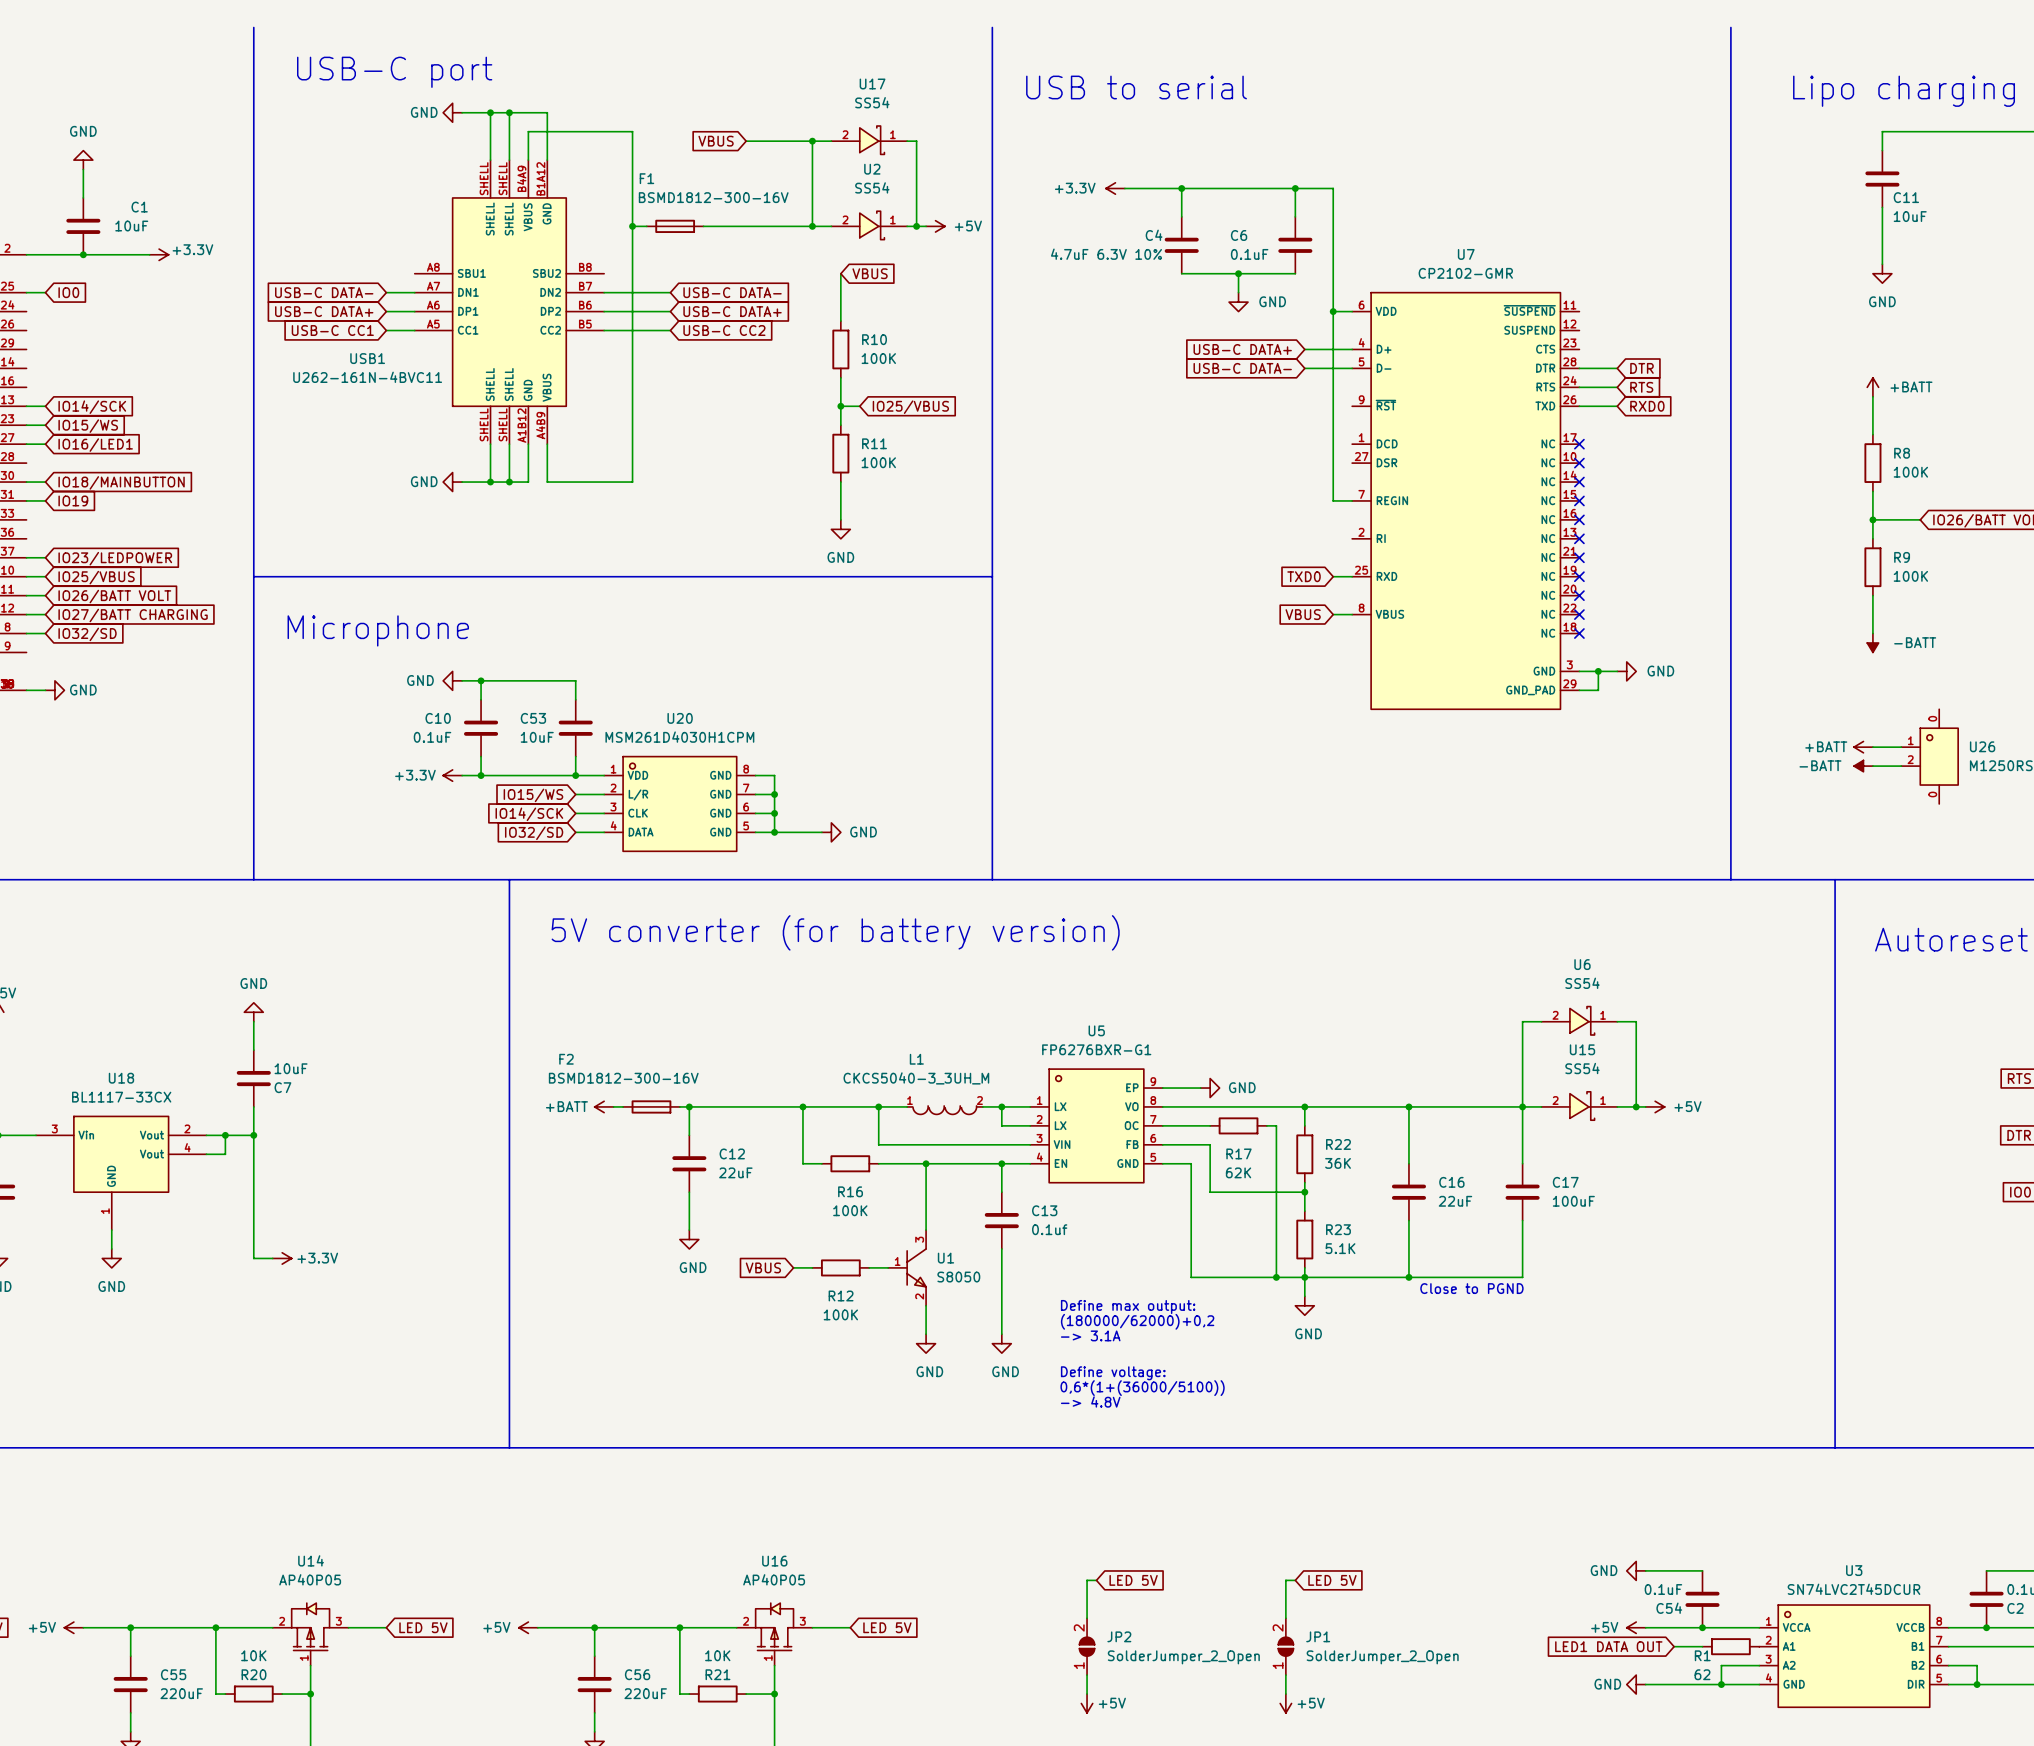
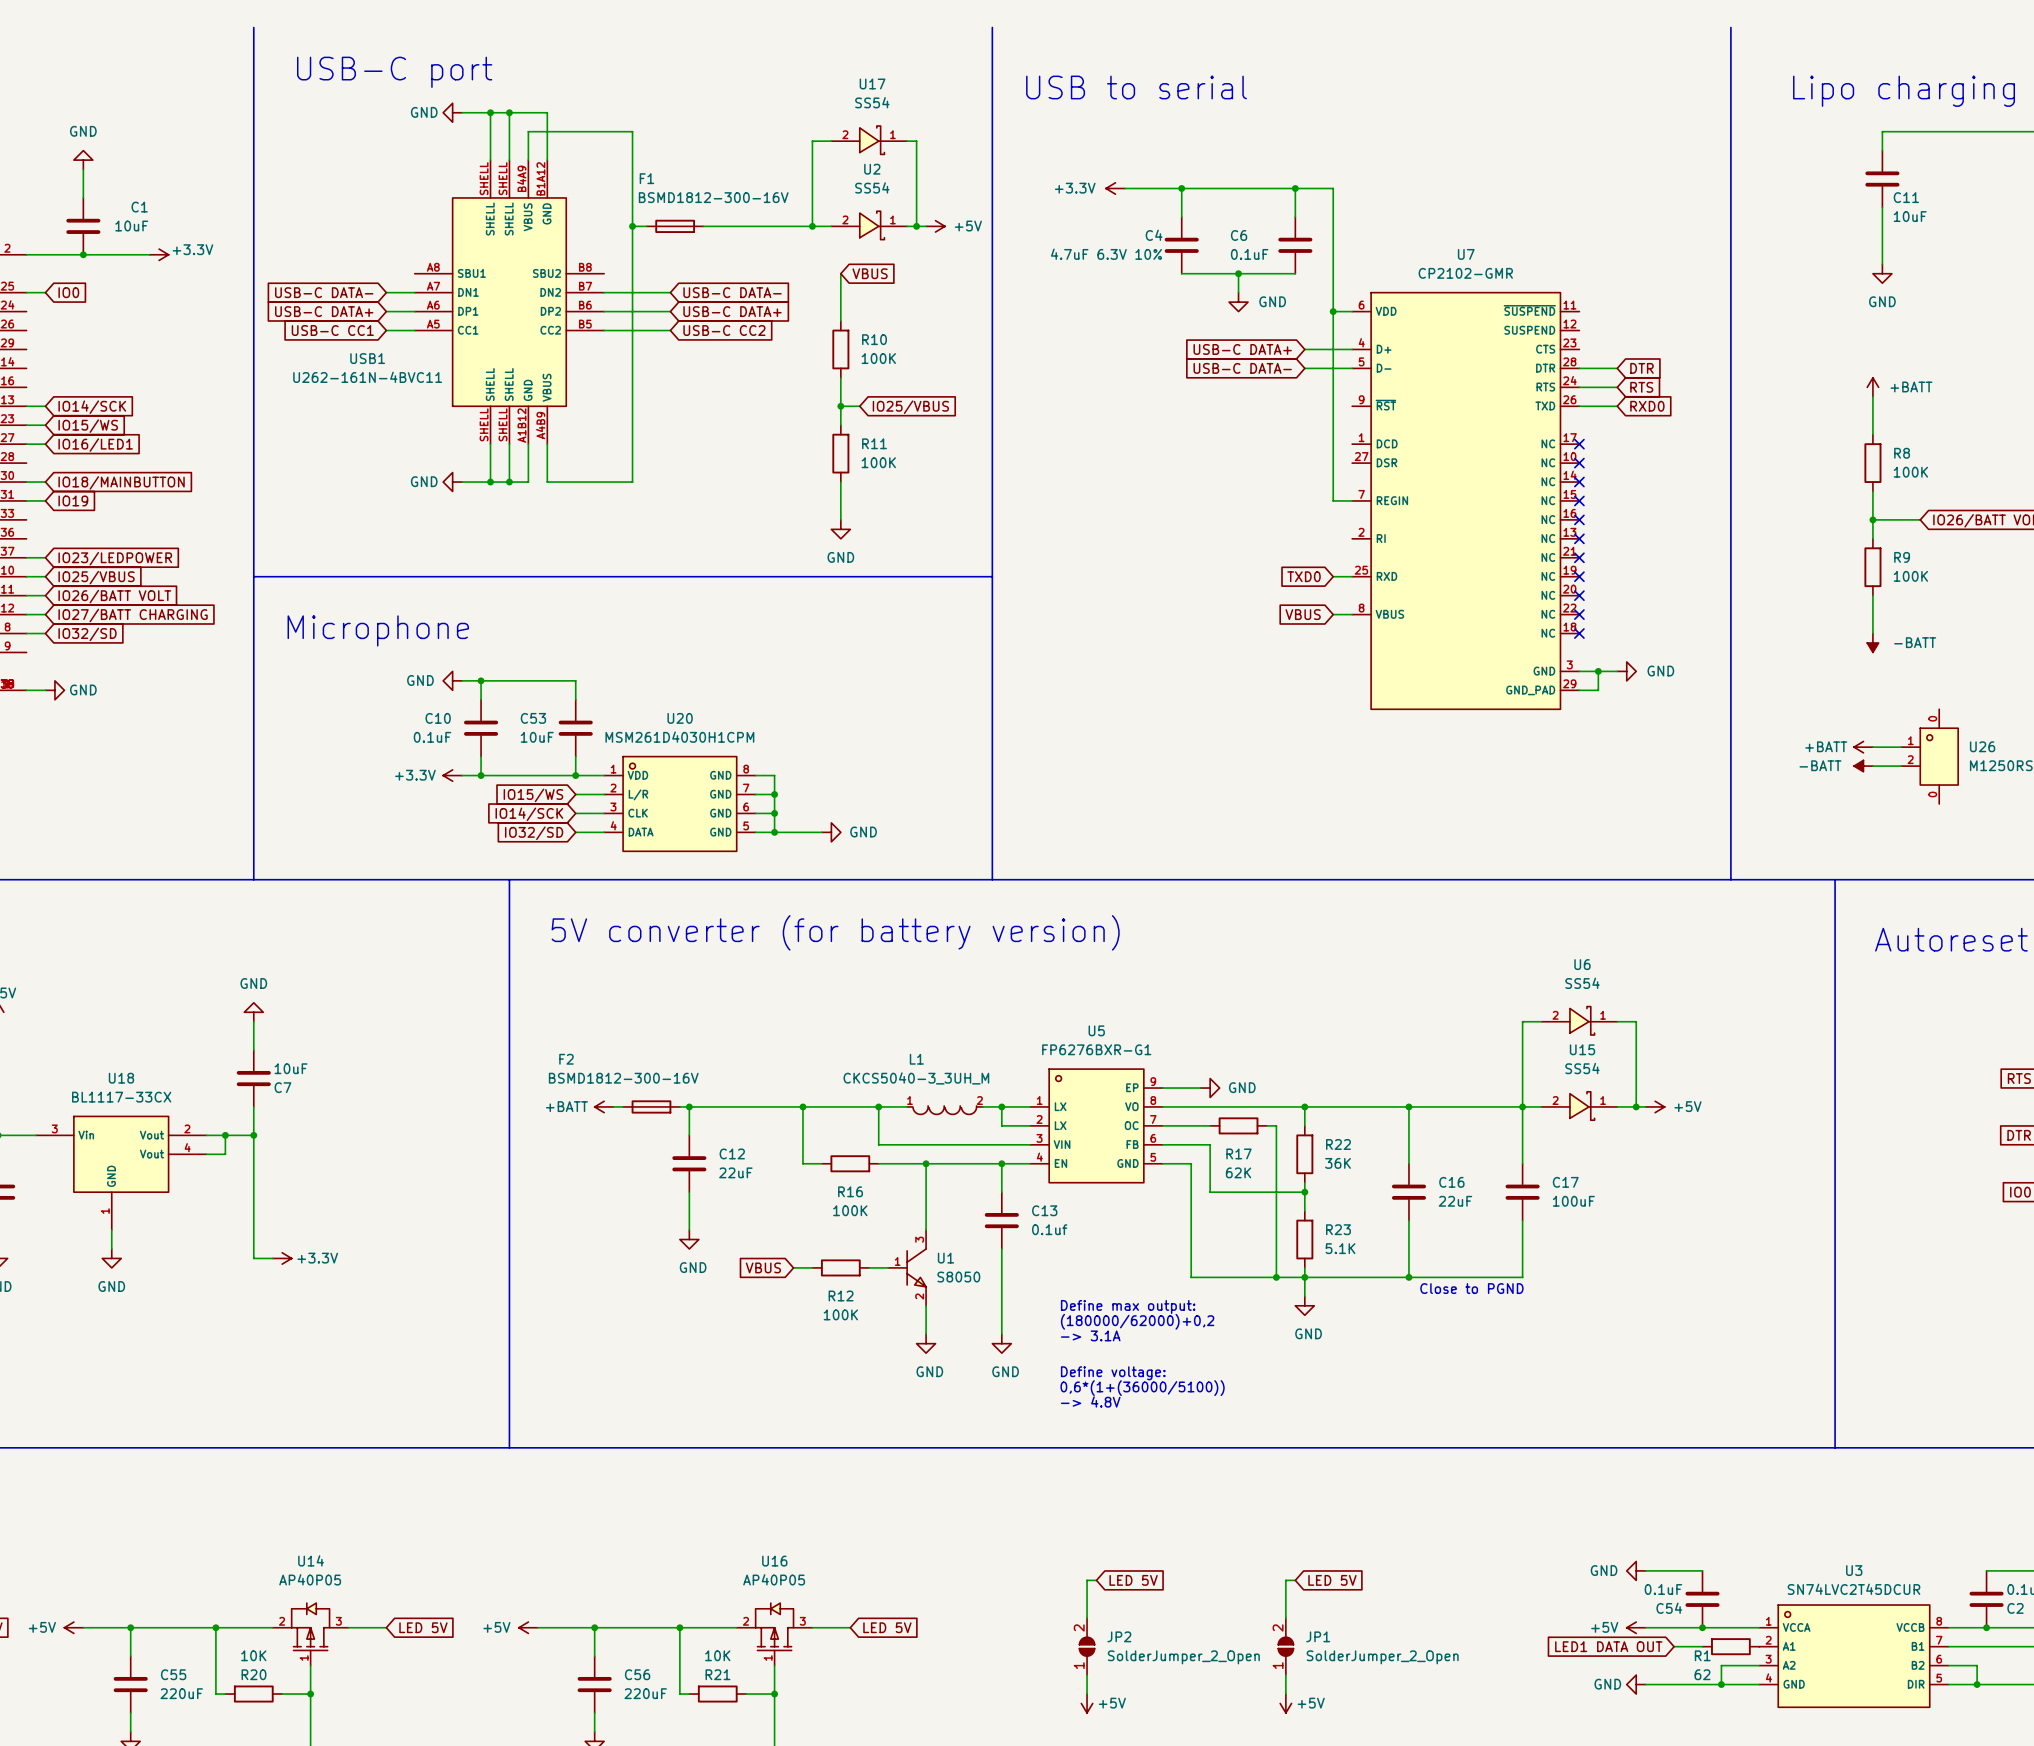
global label: VBUS (716, 141) -> none
wire: (746, 141) (812, 141) -> none
junction: (812, 141) -> none

